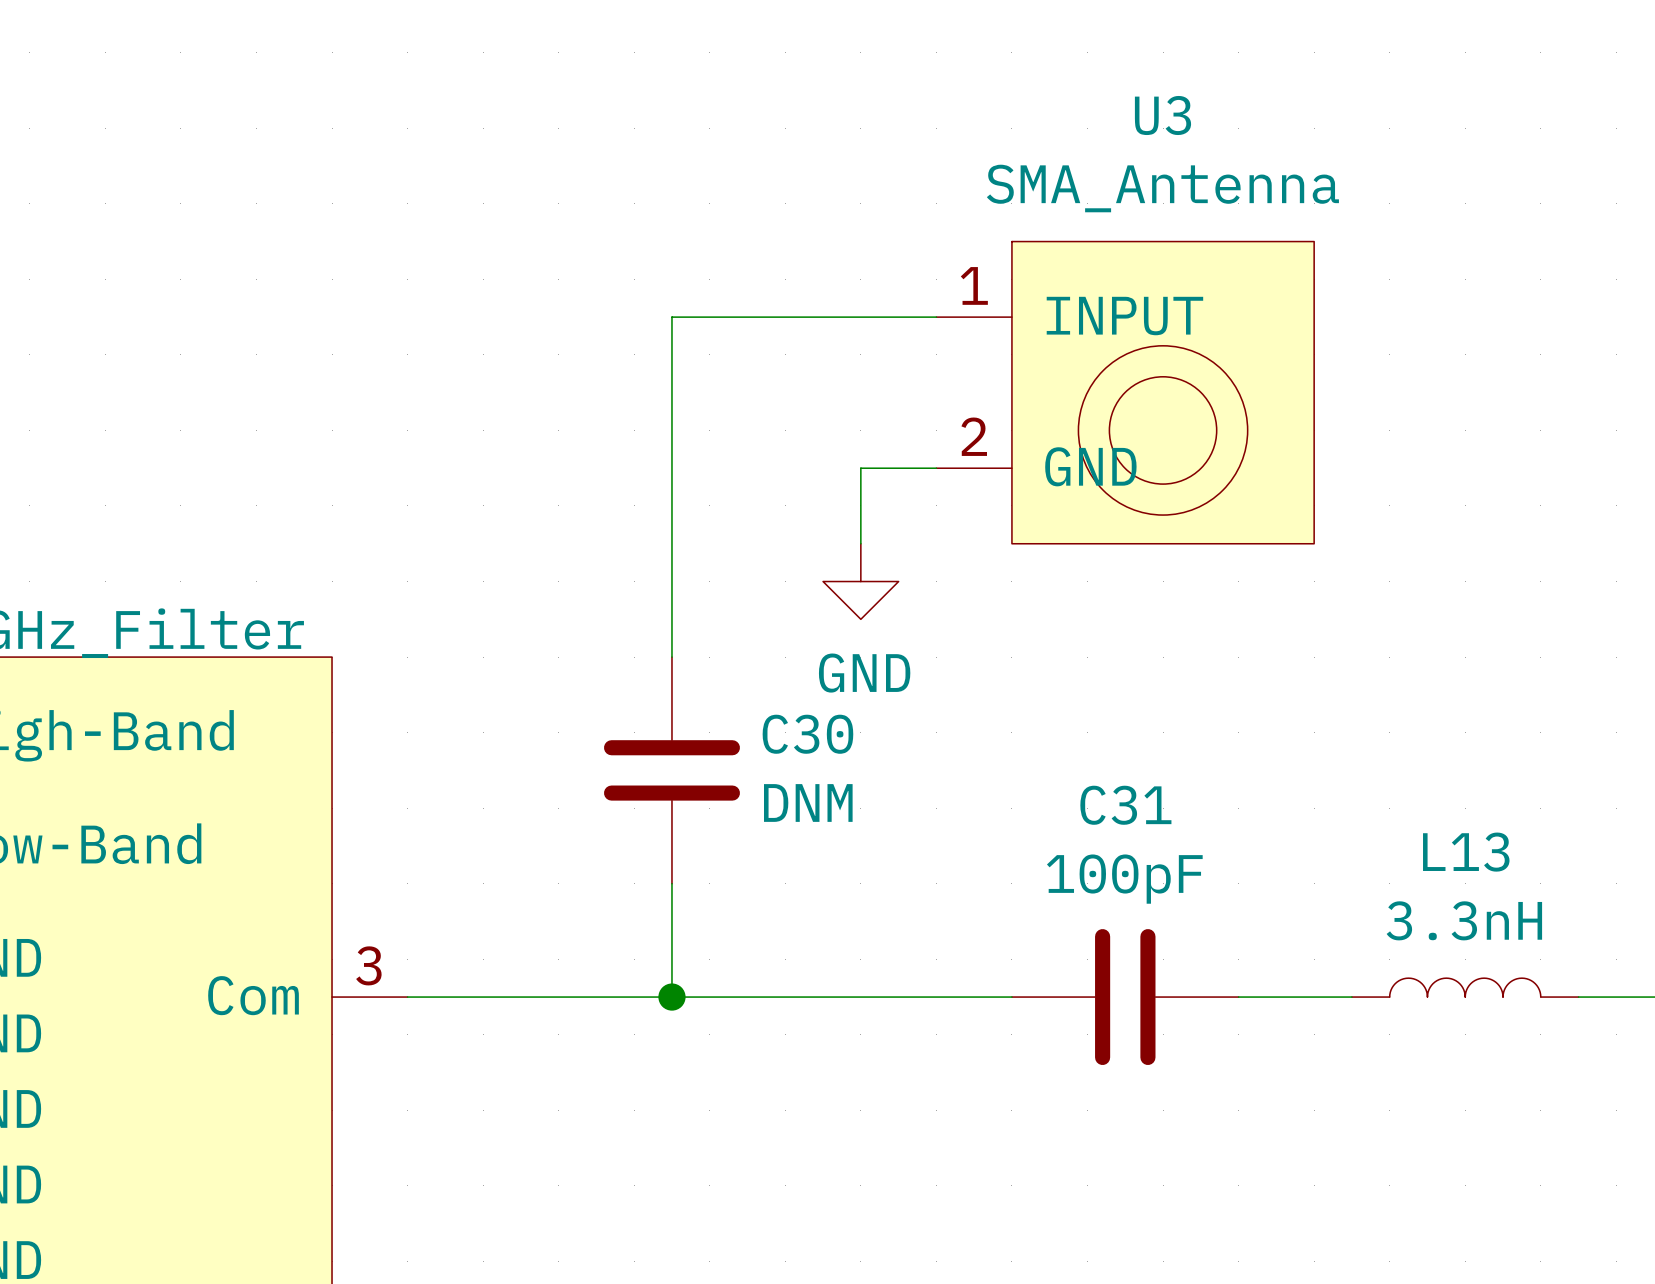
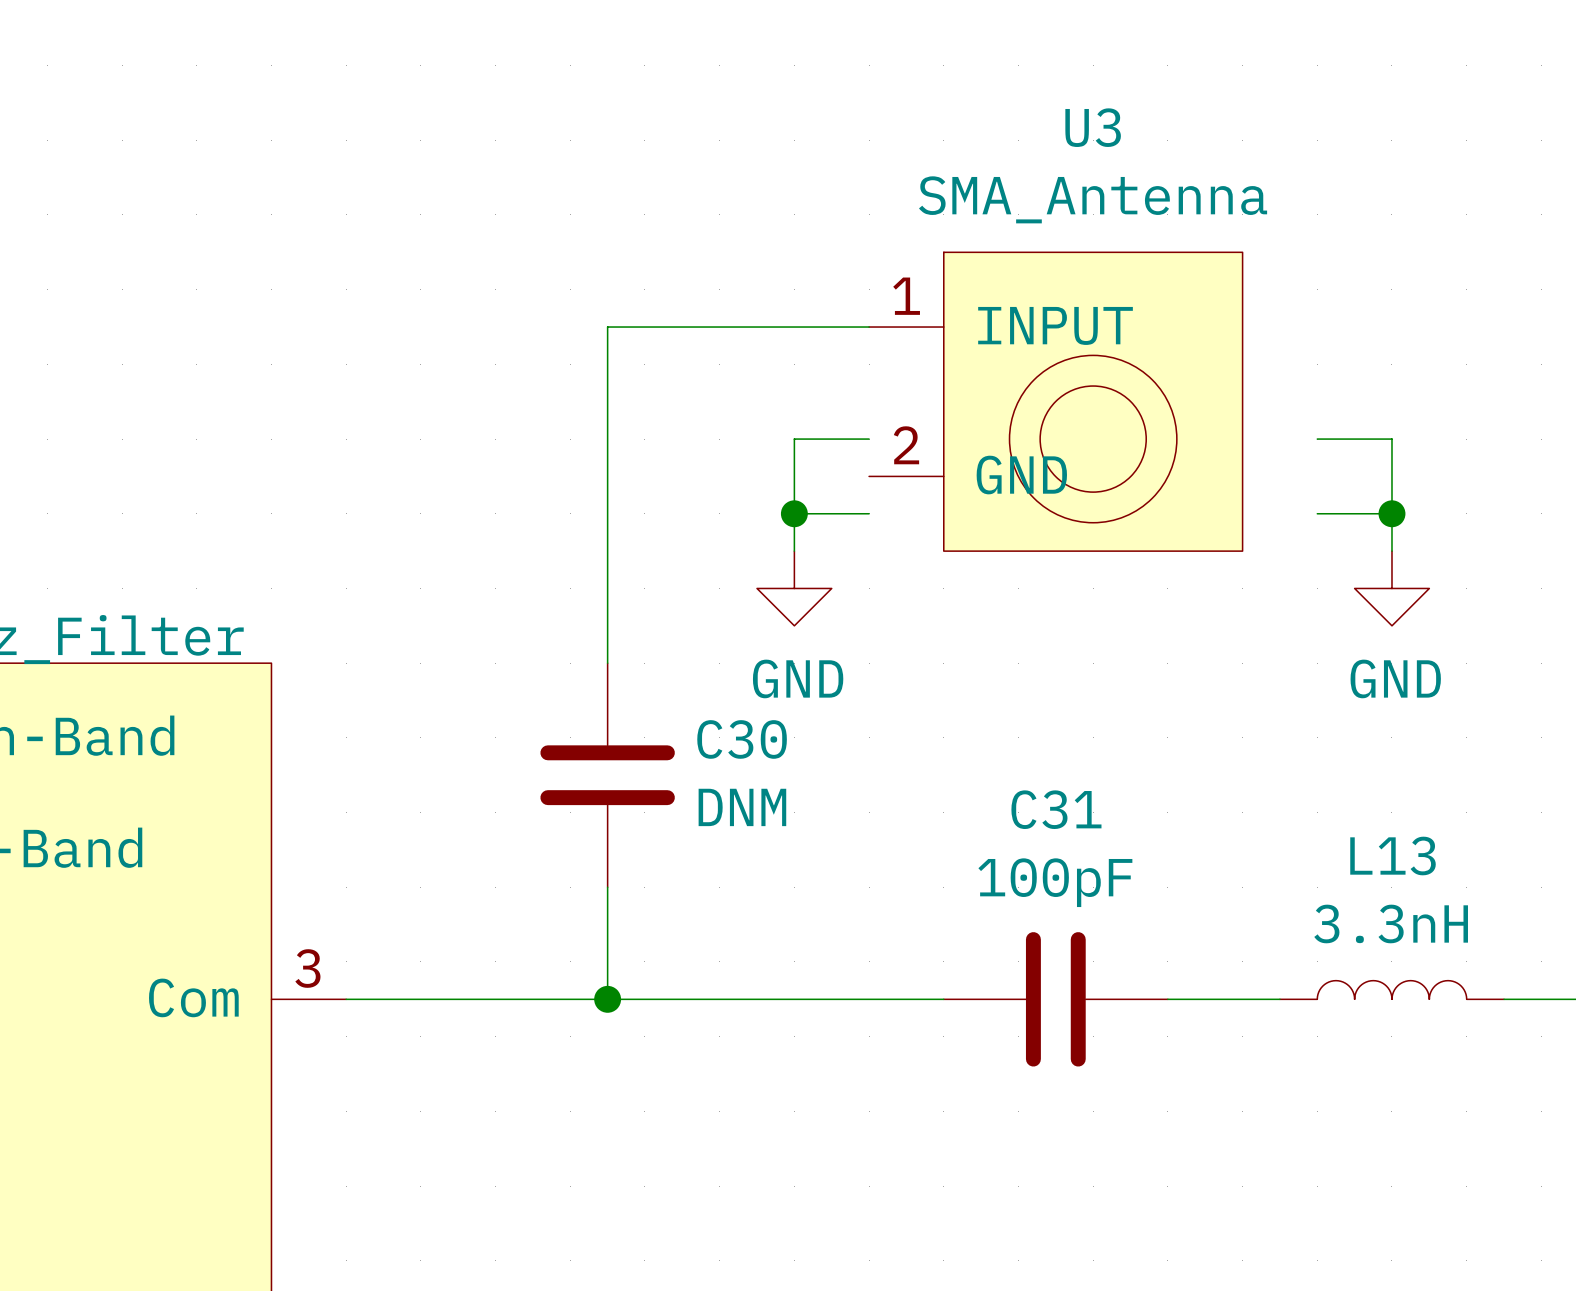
wire: none -> (1317, 439) (1391, 439) (1391, 551)
wire: (860, 468) (936, 468) -> (794, 476) (794, 439) (869, 439)
wire: none -> (794, 513) (869, 513)
junction: none -> (794, 513)
wire: none -> (1317, 513) (1391, 513)
junction: none -> (1391, 513)
power symbol: none -> GND (1391, 588)

